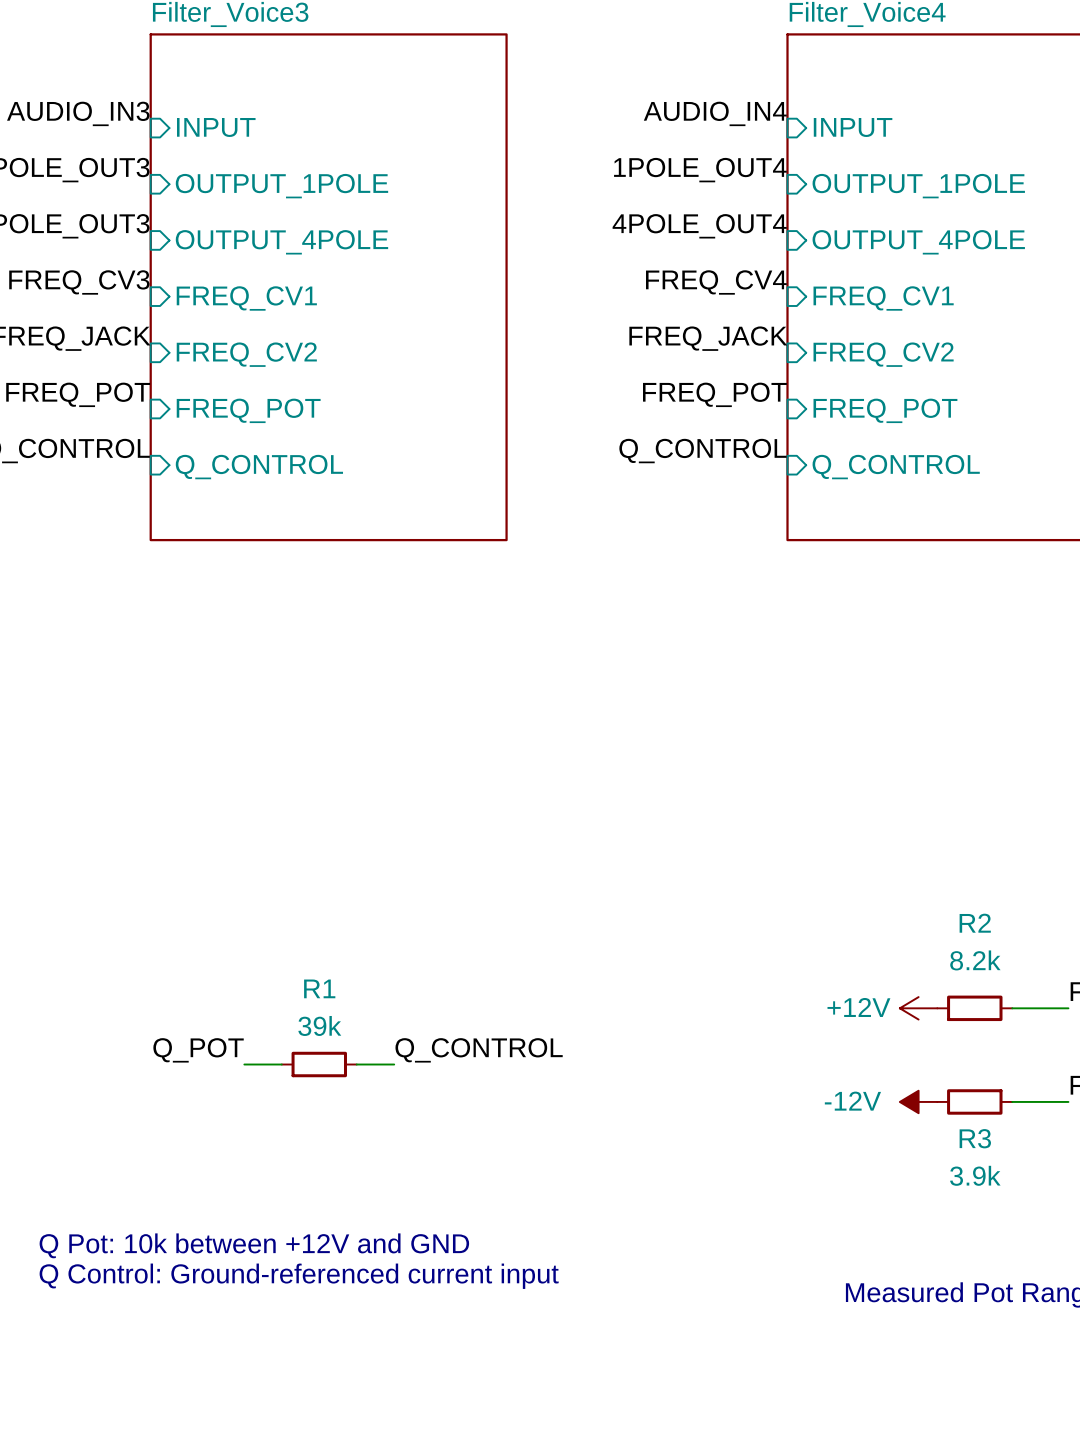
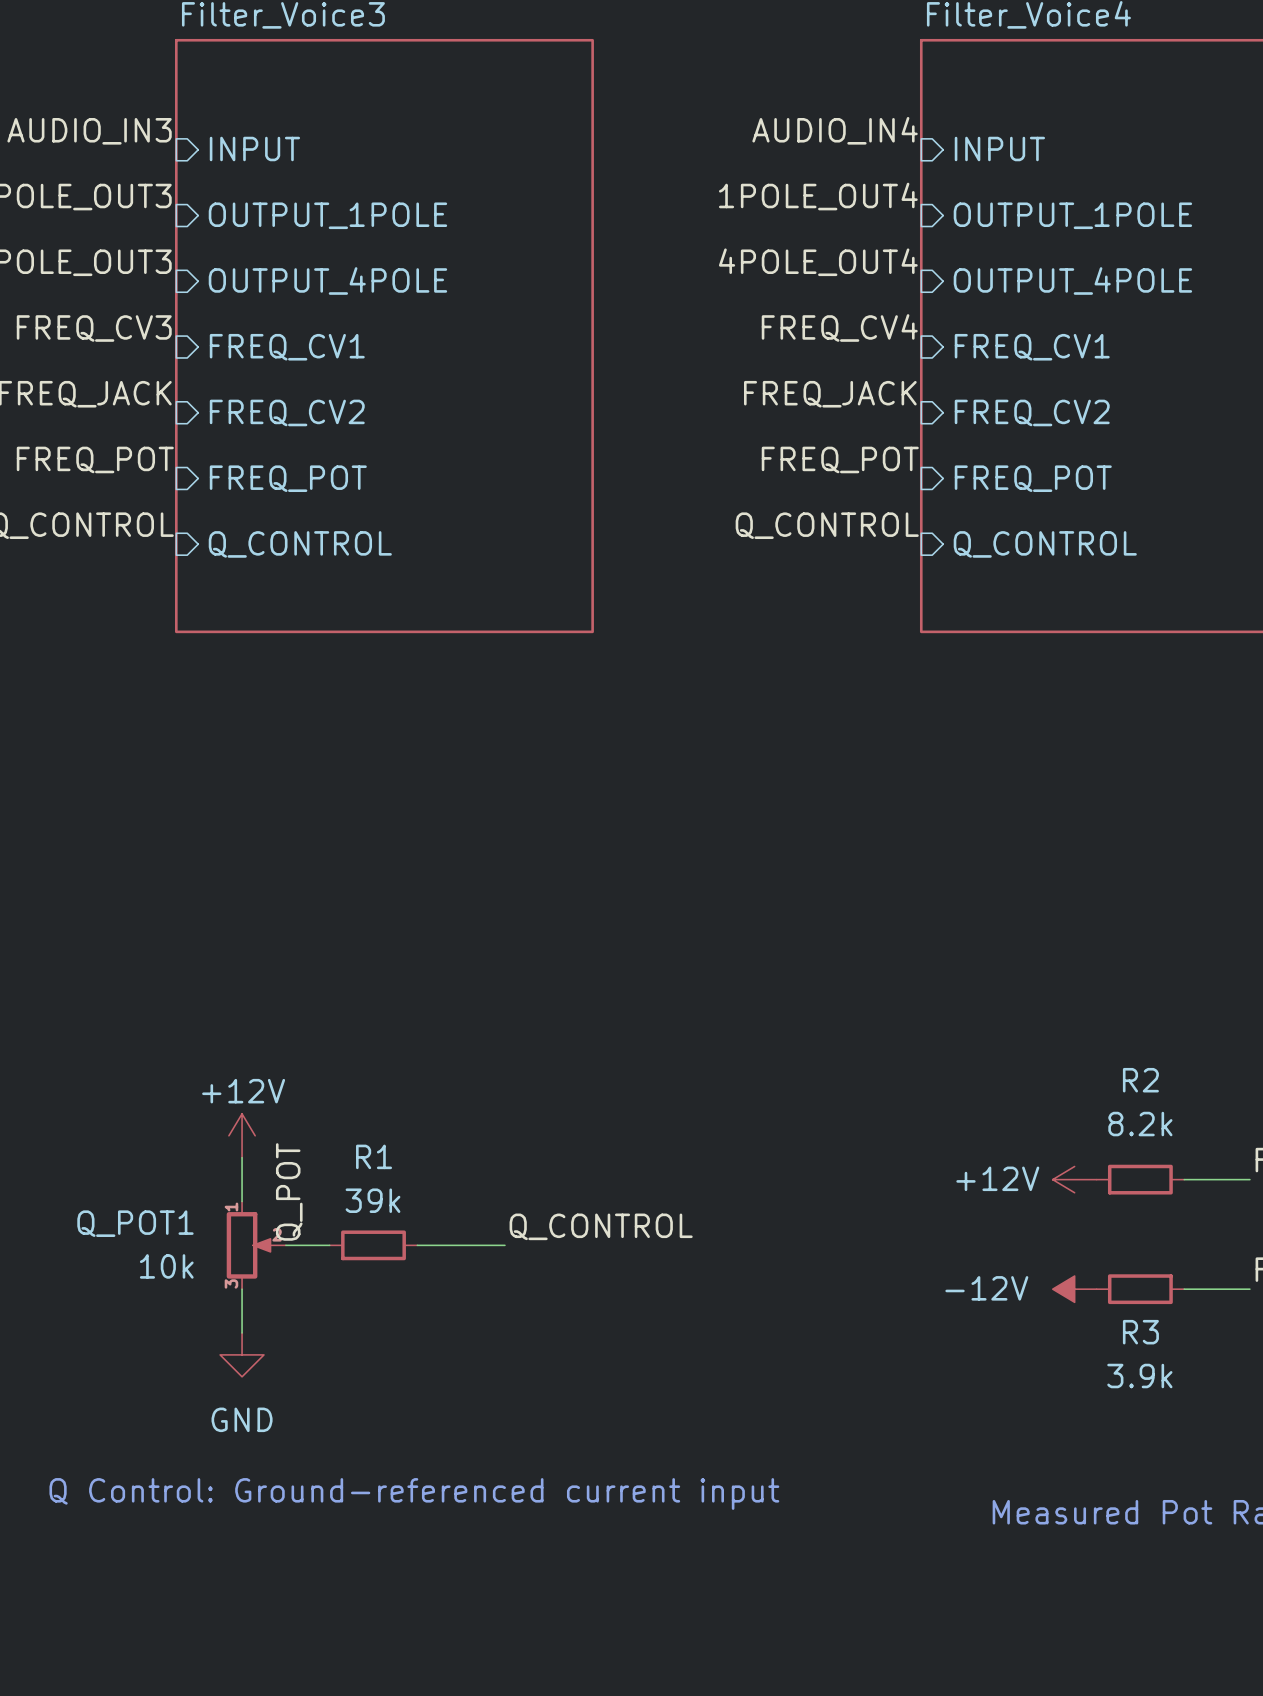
power symbol: none -> +12V (242, 1135)
wire: none -> (242, 1157) (242, 1201)
label rotation: 0° (198, 1050) -> 90° counterclockwise (289, 1191)
label position: Q_CONTROL (479, 1050) -> Q_CONTROL (601, 1226)
Q_POT1: none -> 10k (256, 1245)
wire: none -> (461, 1245) (504, 1245)
wire: none -> (242, 1289) (242, 1333)
power symbol: none -> GND (242, 1354)
text: Q Pot: 10k between +12V and GND (254, 1245) -> none

